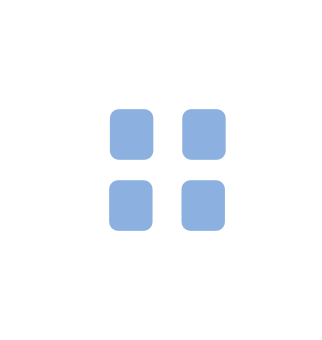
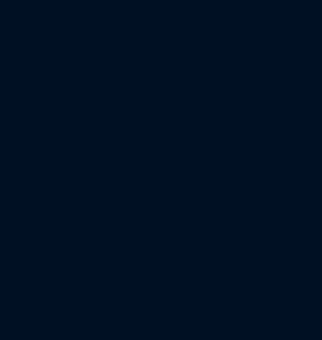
part: (167, 134) -> none
part: (167, 205) -> none

